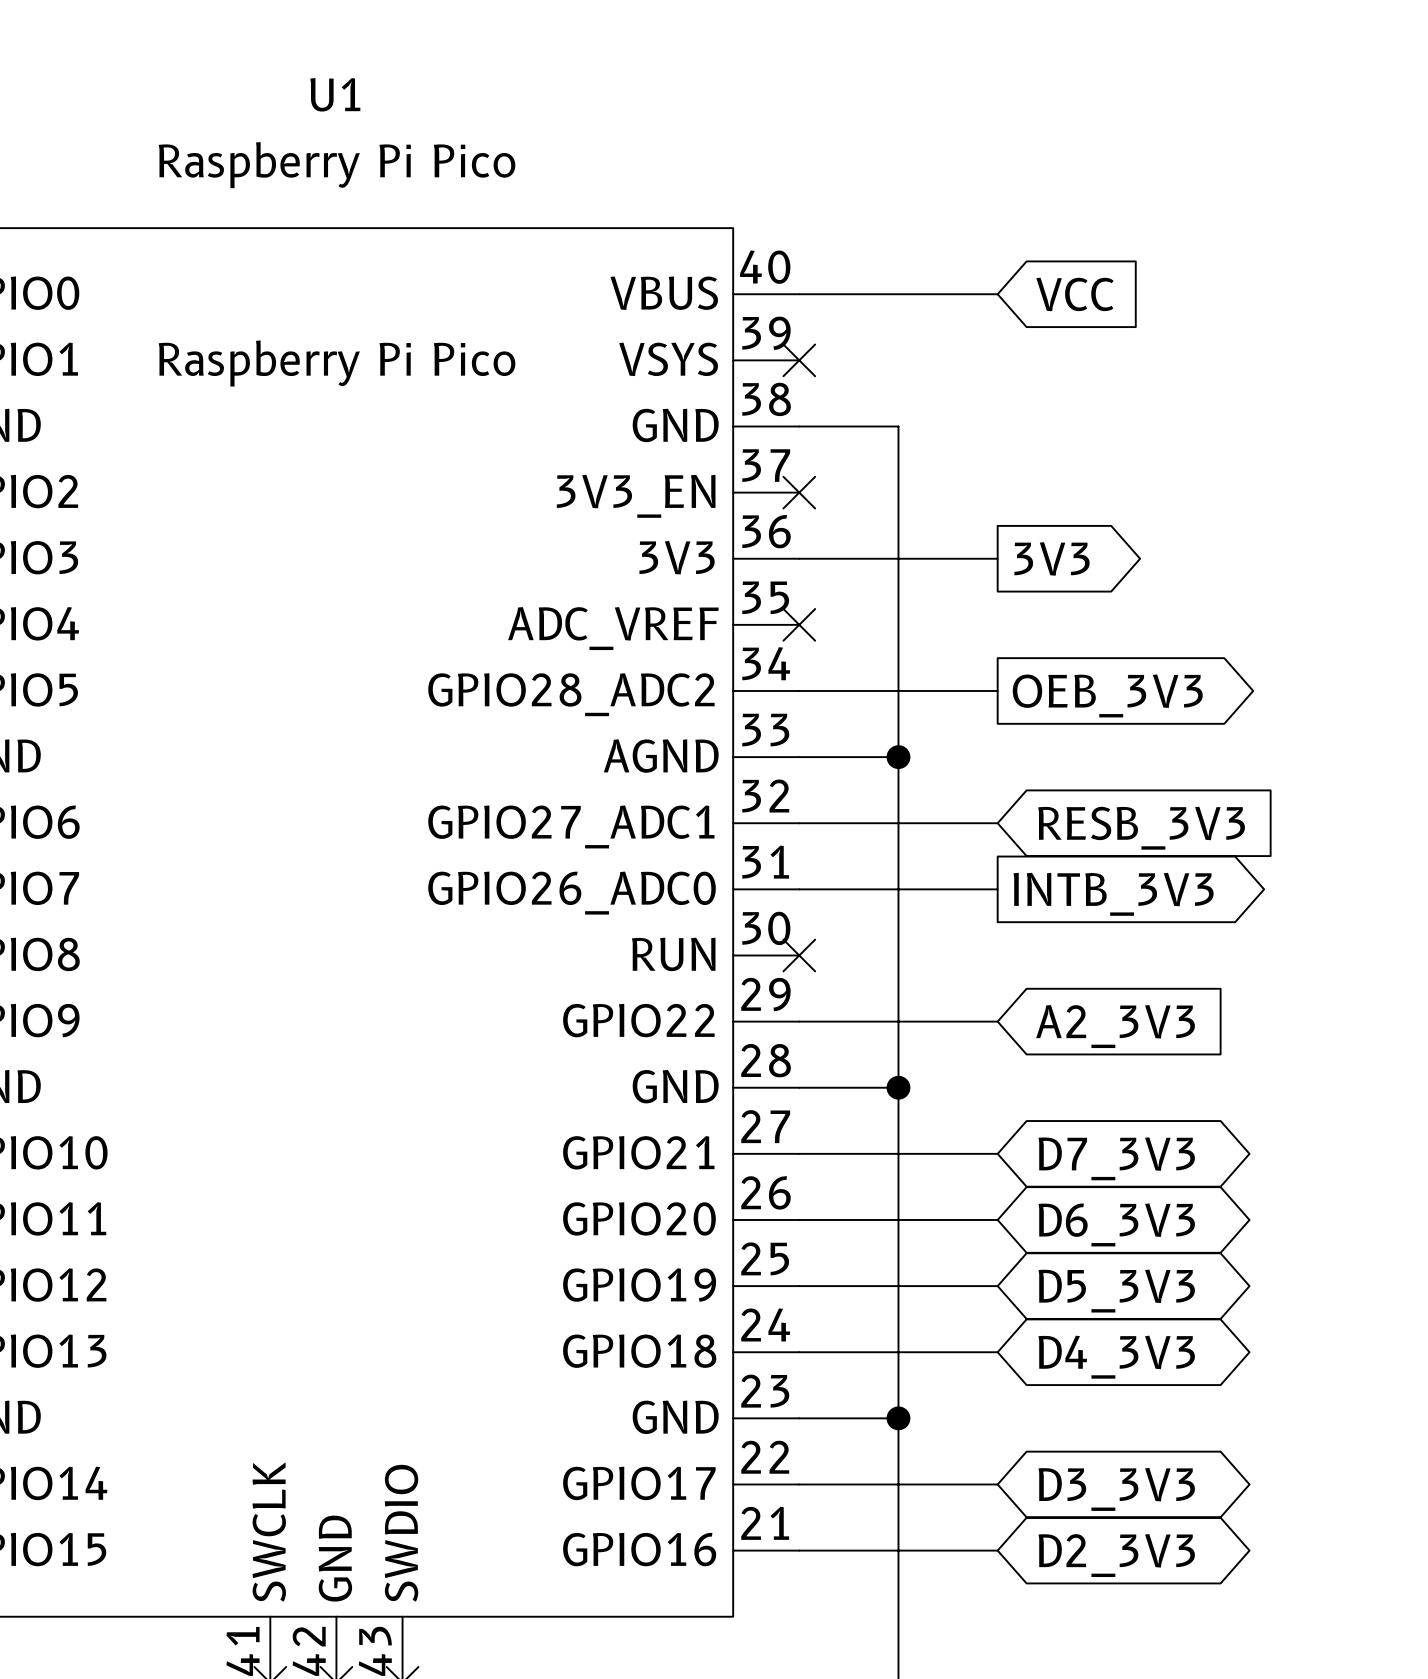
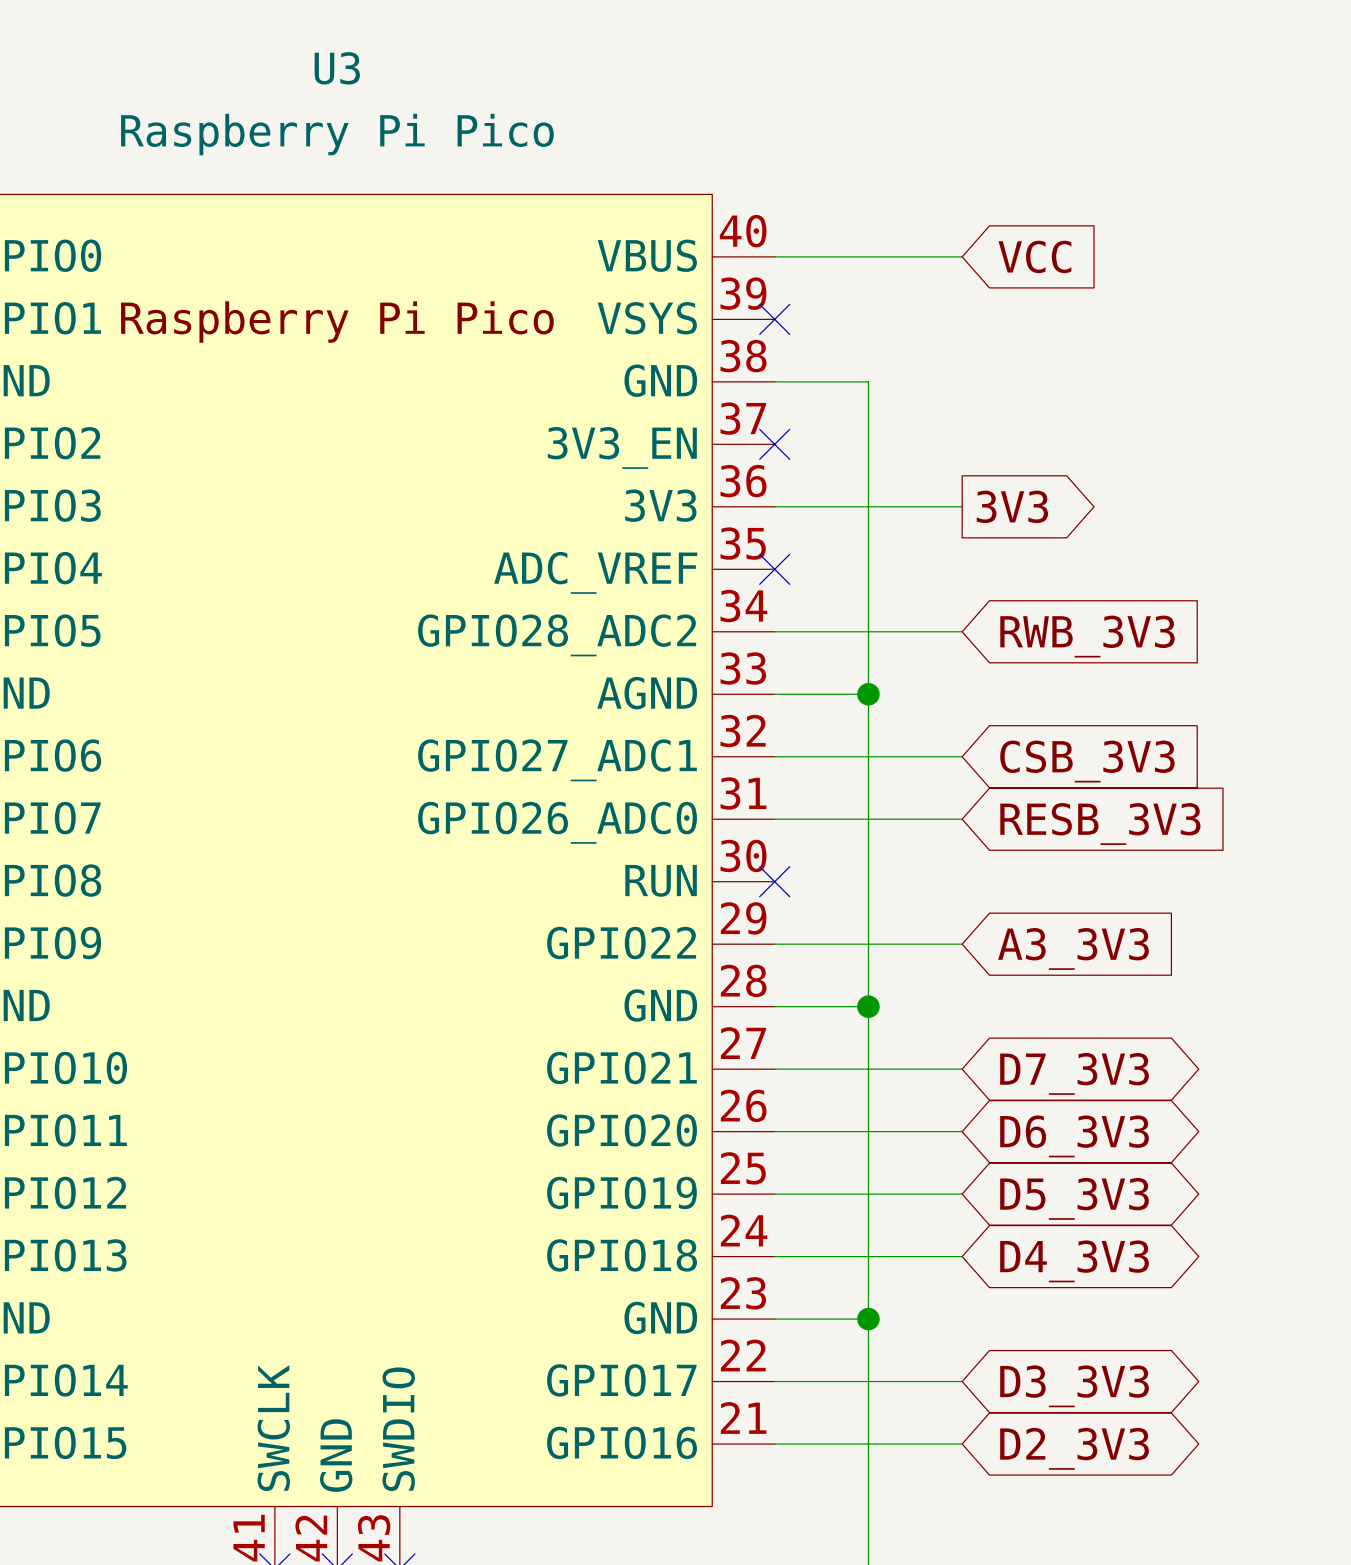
U1 name: U1 (335, 94) -> U3 (337, 68)
global label shape: output (1107, 695) -> input (1087, 636)
global label: OEB_3V3 (1107, 695) -> RWB_3V3 (1087, 636)
global label: RESB_3V3 (1141, 828) -> CSB_3V3 (1087, 761)
global label shape: output (1113, 894) -> input (1100, 823)
global label: INTB_3V3 (1113, 894) -> RESB_3V3 (1100, 823)
global label: A2_3V3 (1115, 1026) -> A3_3V3 (1073, 948)

